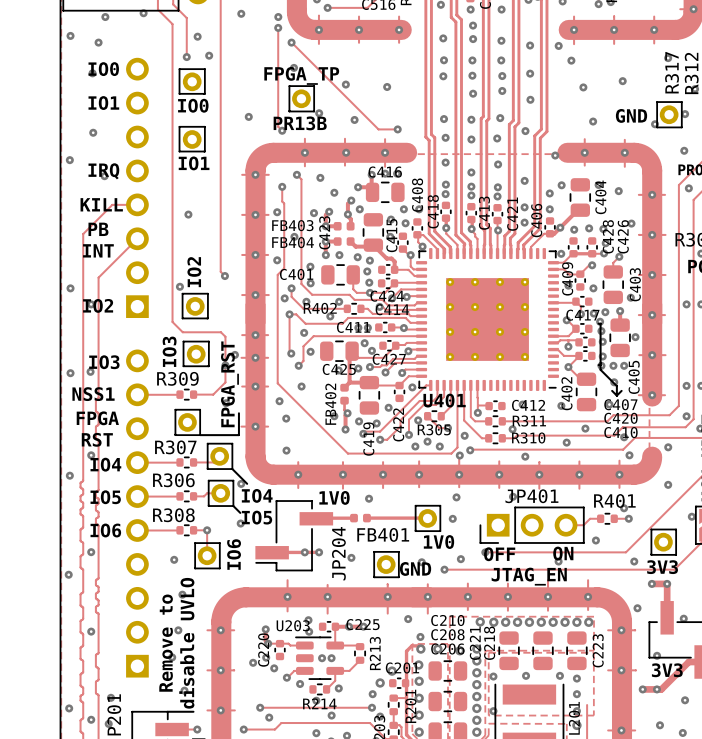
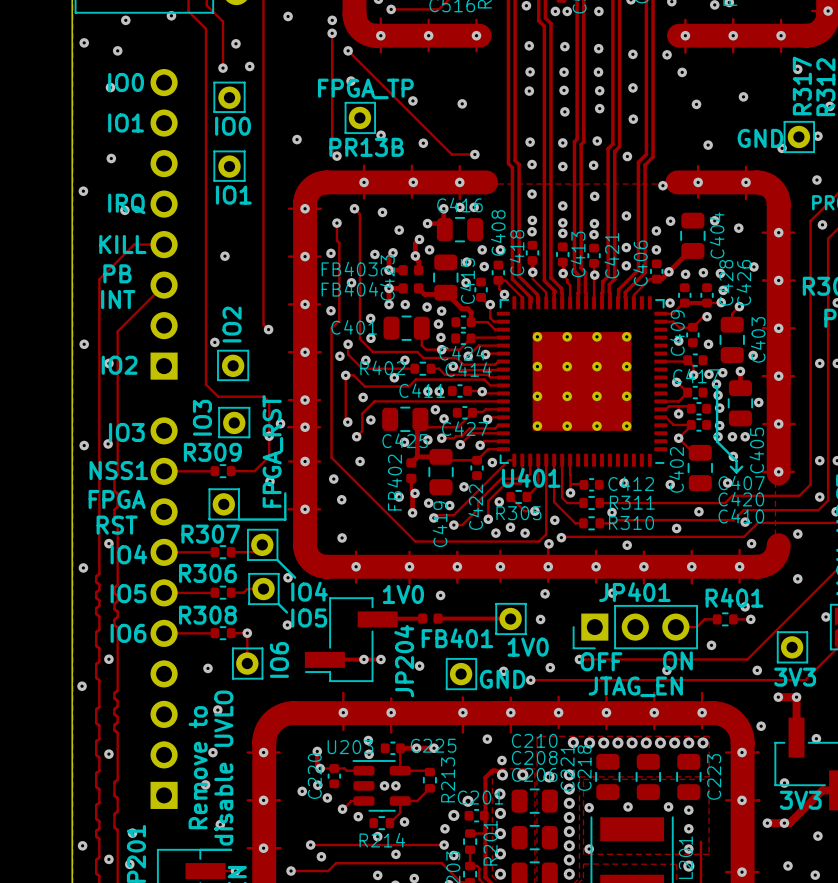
via: none -> (555, 11)
via: (470, 9) -> none
via: none -> (567, 11)
via: (473, 25) -> none

